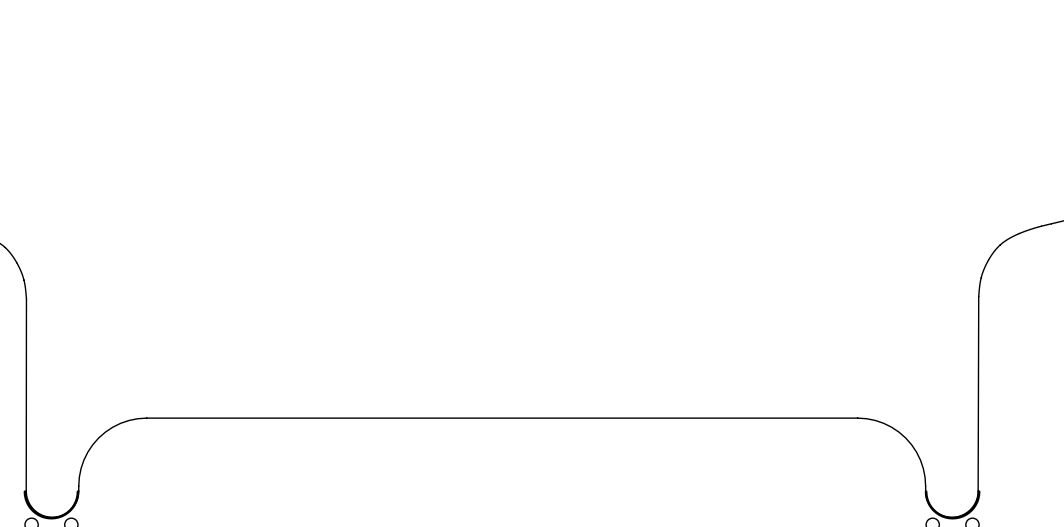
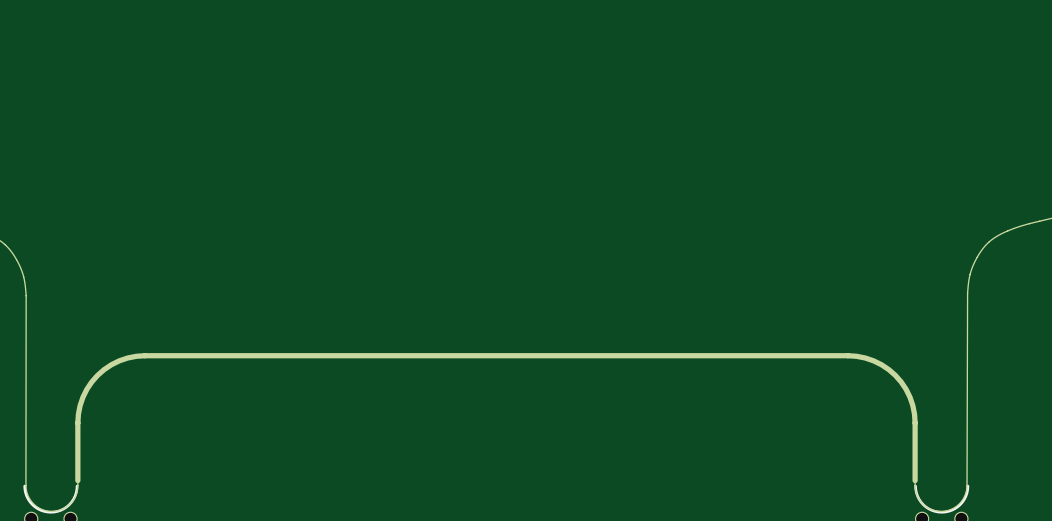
board edge: (78, 486) (83, 460) (98, 438) (120, 423) (146, 418) (866, 418) (891, 427) (911, 444) (923, 468) (925, 486) -> (77, 480) (78, 414) (86, 389) (97, 375) (111, 364) (127, 358) (145, 355) (856, 356) (873, 360) (888, 369) (901, 382) (909, 397) (915, 422) (915, 480)

